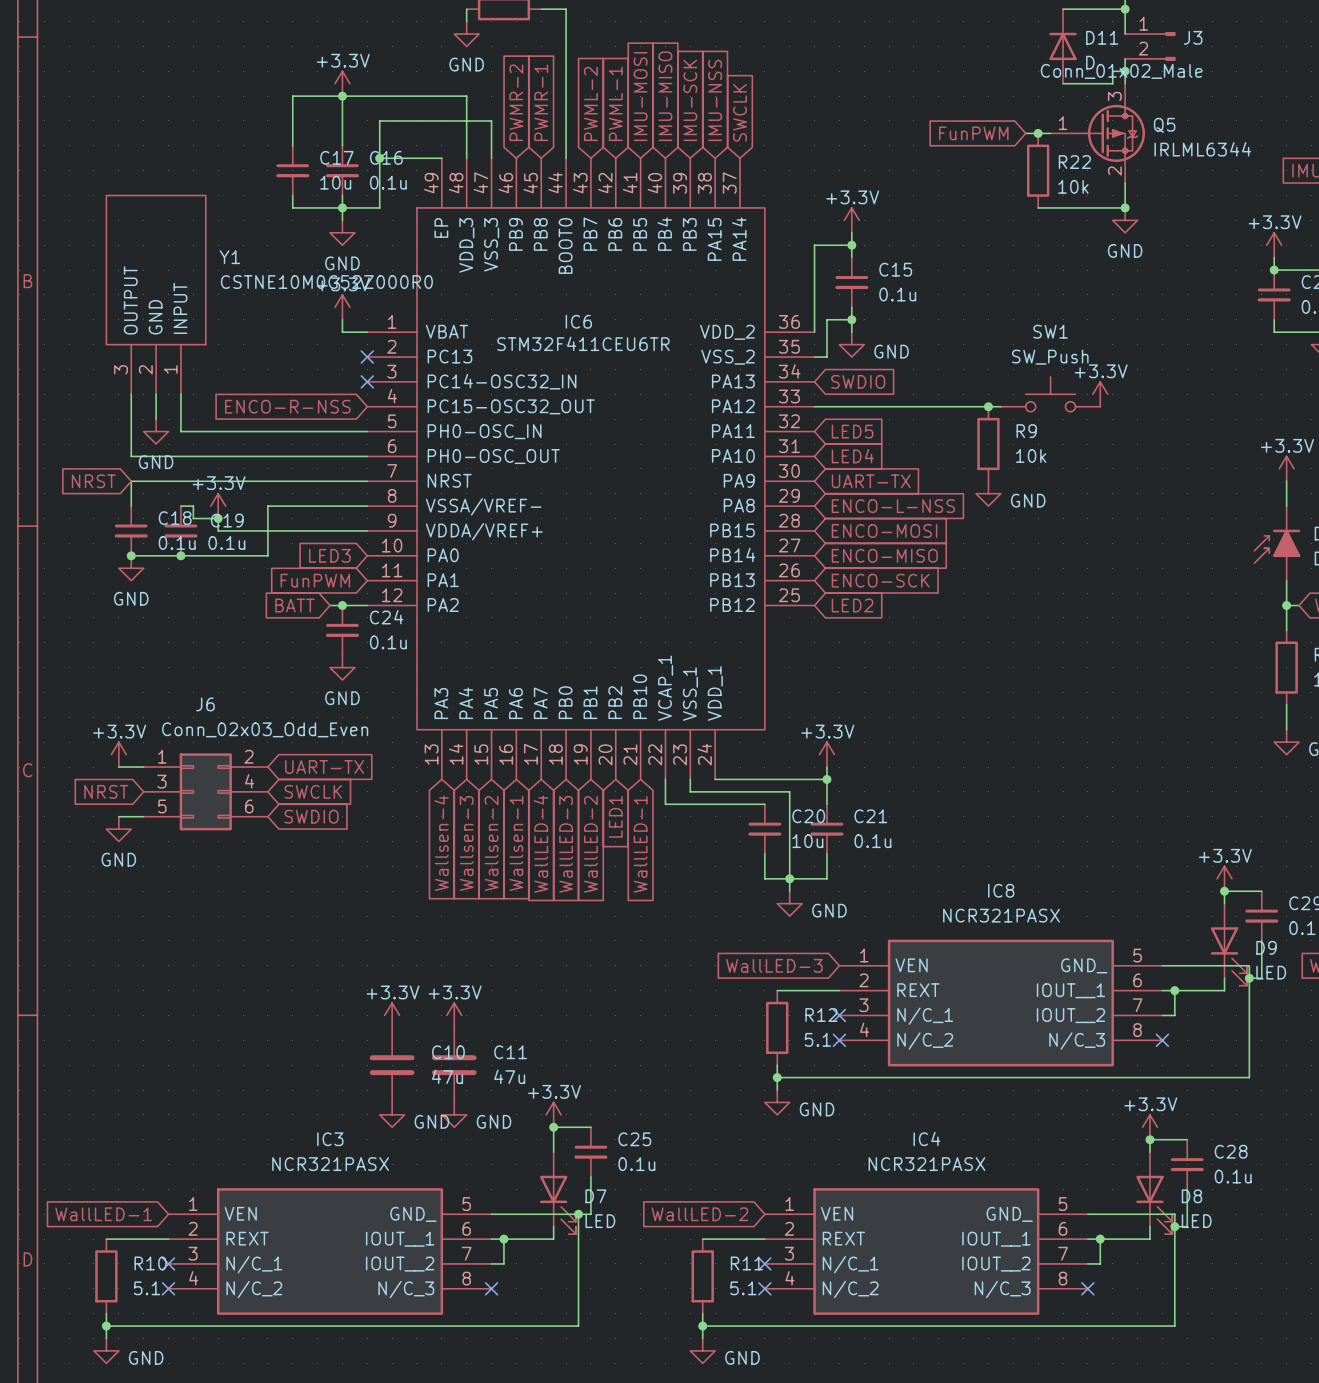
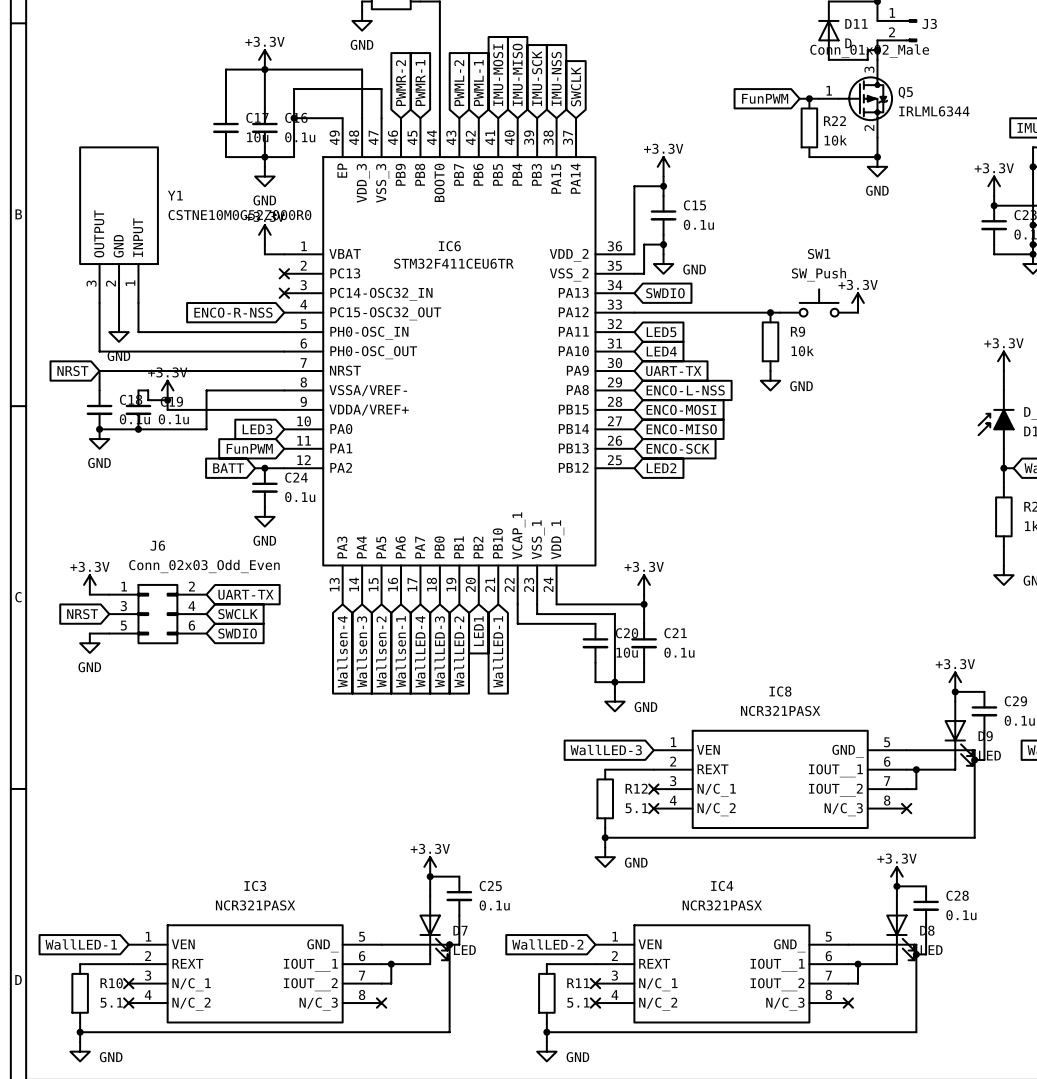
power symbol: +3.3V (392, 1015) -> none
power symbol: +3.3V (454, 1015) -> none
C10: 47u (392, 1065) -> none
C11: 47u (454, 1065) -> none
power symbol: GND (392, 1114) -> none
power symbol: GND (454, 1114) -> none

